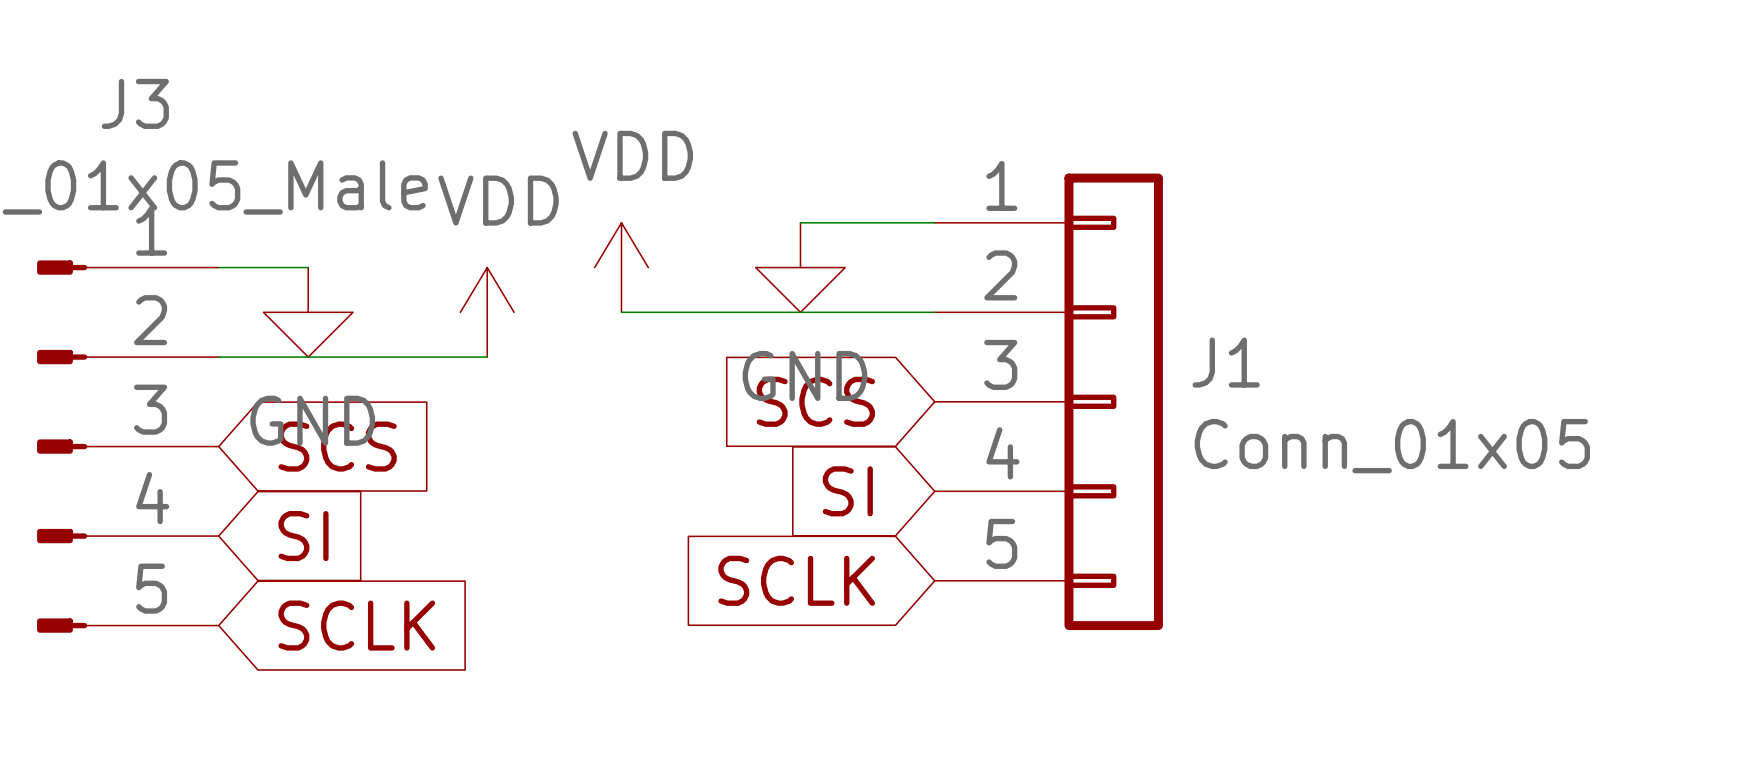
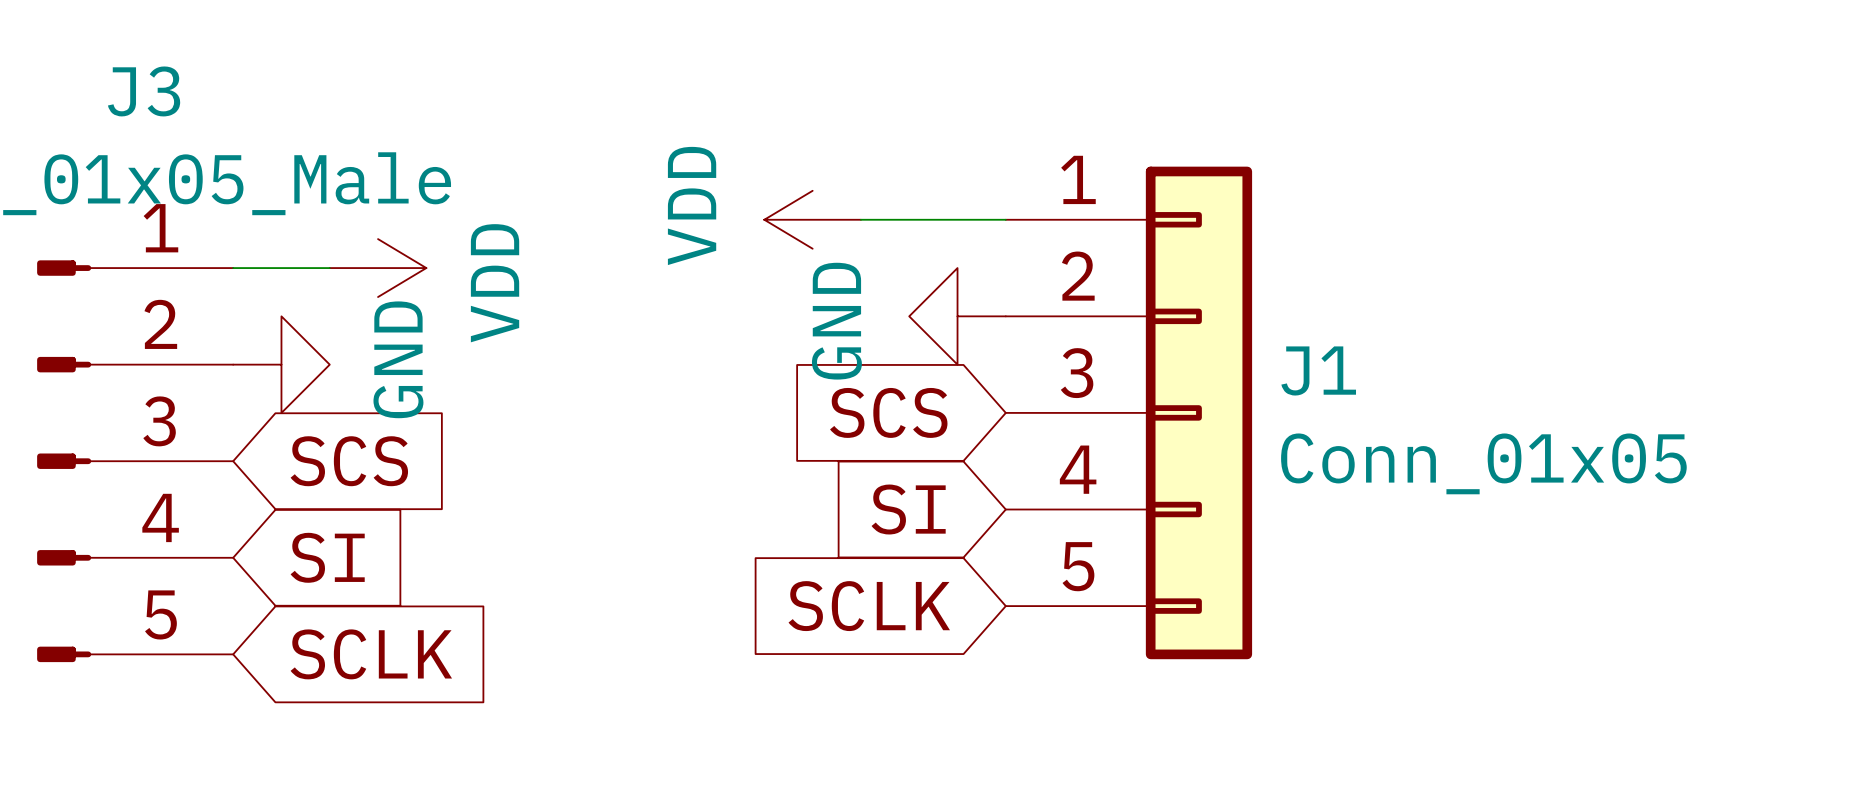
power symbol: none -> VDD (812, 219)
power symbol: none -> VDD (378, 268)
power symbol: VDD (621, 267) -> none
power symbol rotation: 0° (800, 267) -> 90° clockwise (957, 316)
power symbol position: GND (800, 267) -> GND (957, 316)
power symbol rotation: 0° (308, 312) -> 90° counterclockwise (281, 364)
power symbol position: GND (308, 312) -> GND (281, 364)
power symbol: VDD (487, 312) -> none
wire: (621, 312) (934, 312) -> none
wire: (218, 357) (487, 357) -> none

